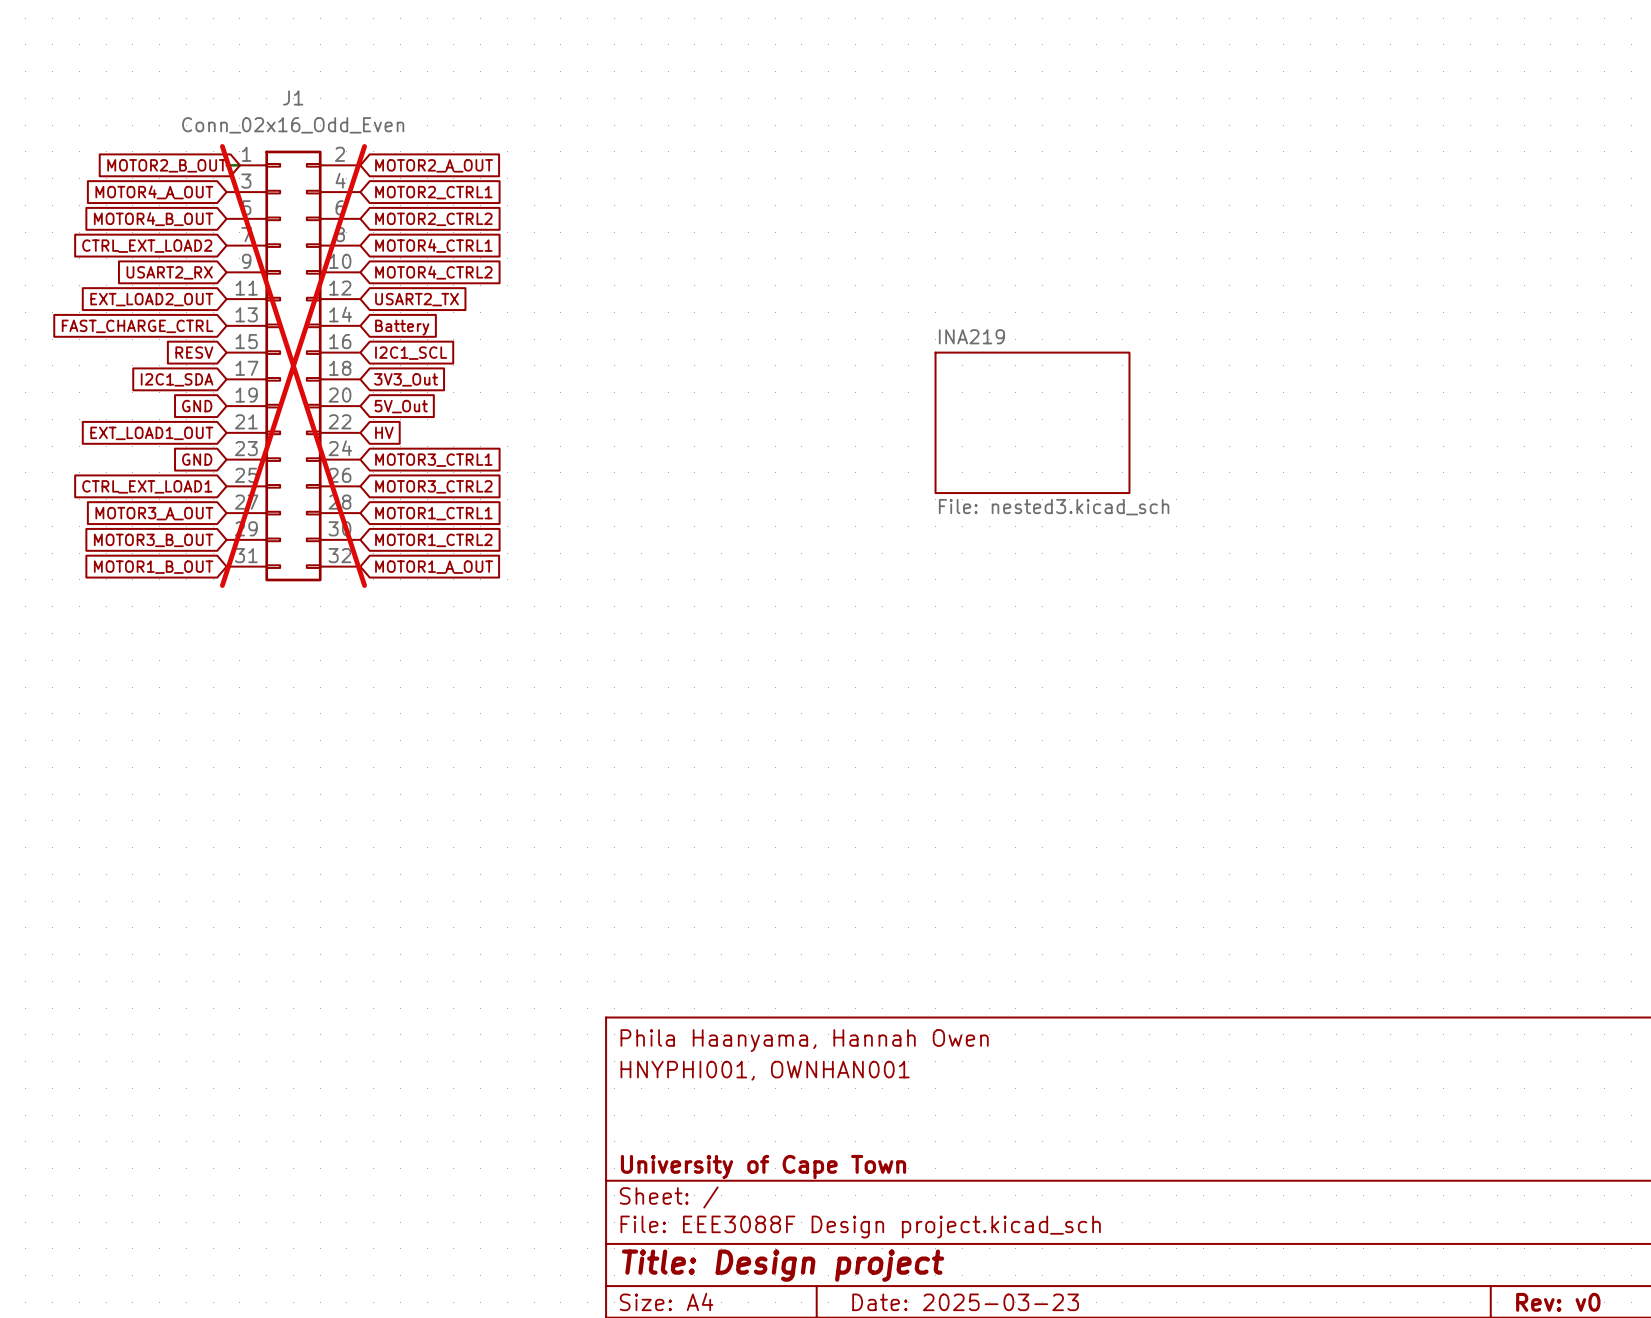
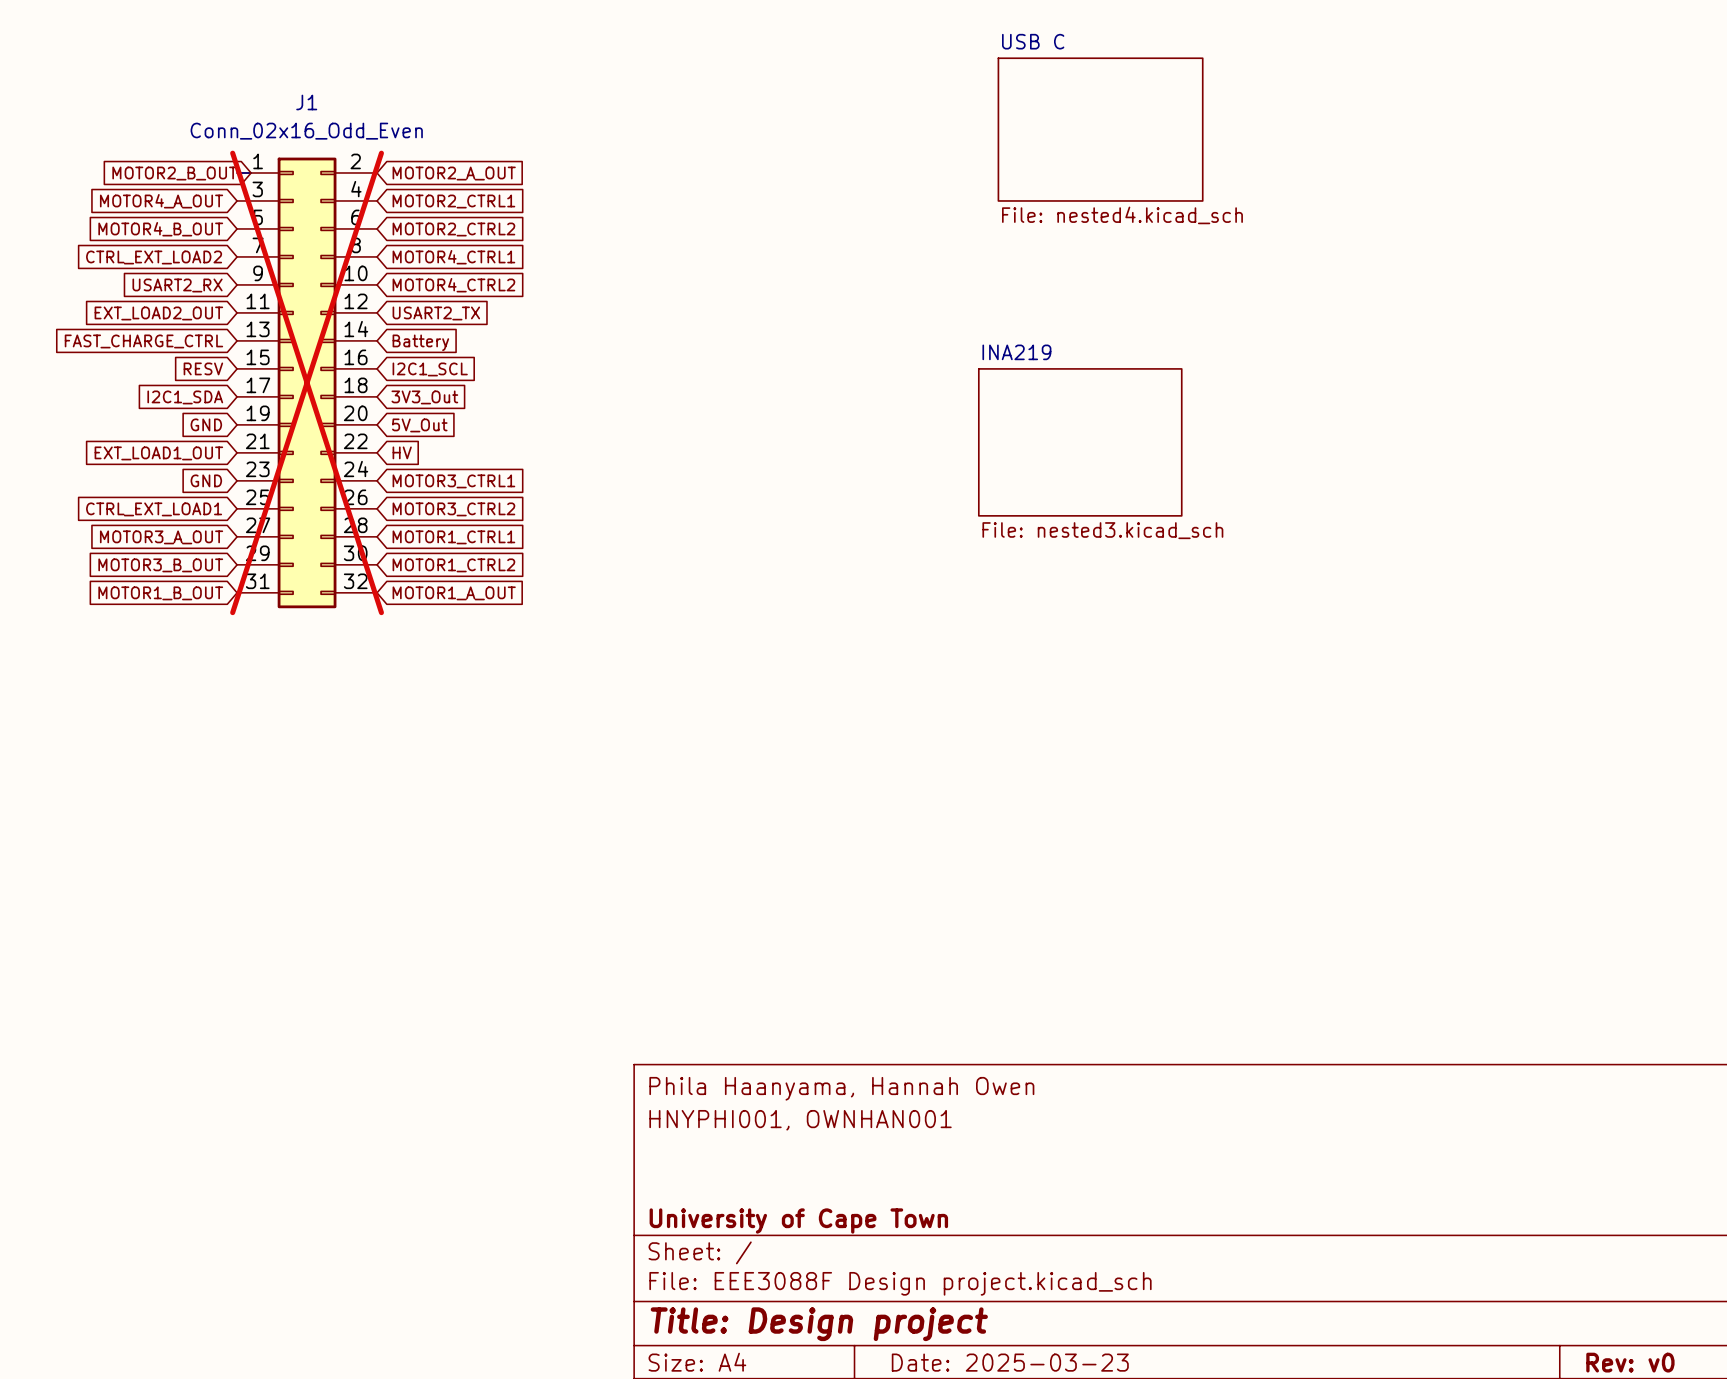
sheet USB C: none -> File: nested4.kicad_sch (1100, 129)

